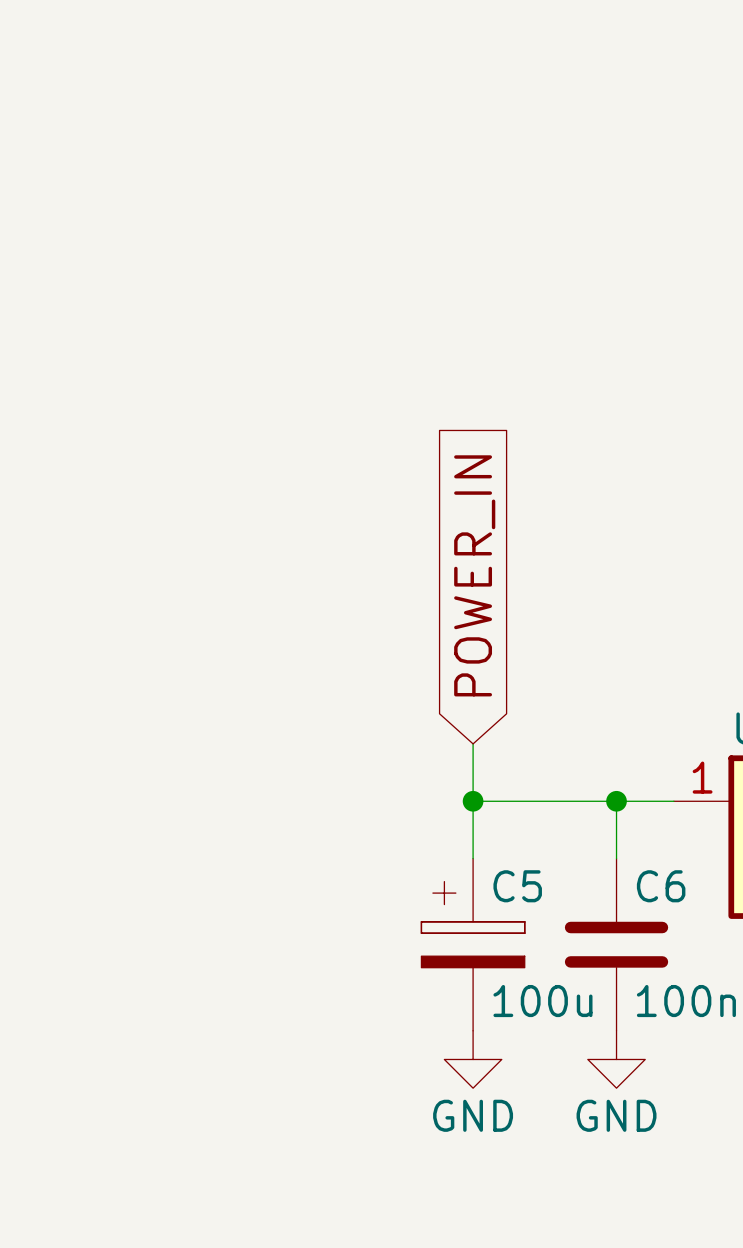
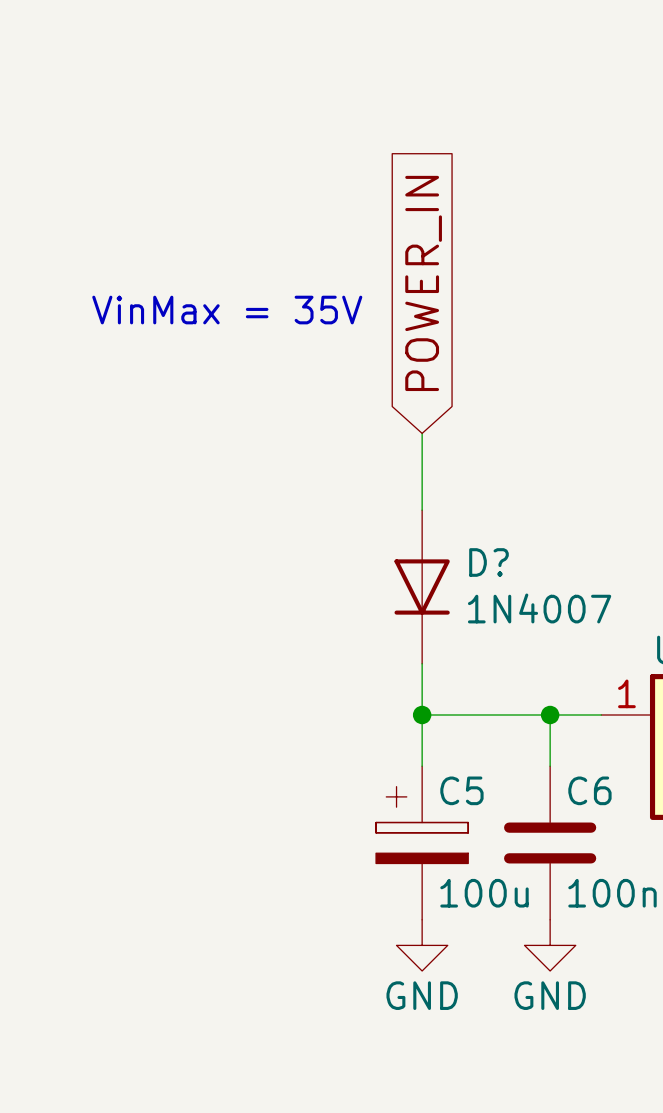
text: none -> VinMax = 35V (227, 310)
wire: none -> (422, 433) (422, 510)
global label position: POWER_IN (474, 575) -> POWER_IN (423, 283)
D?: none -> 1N4007 (422, 587)

